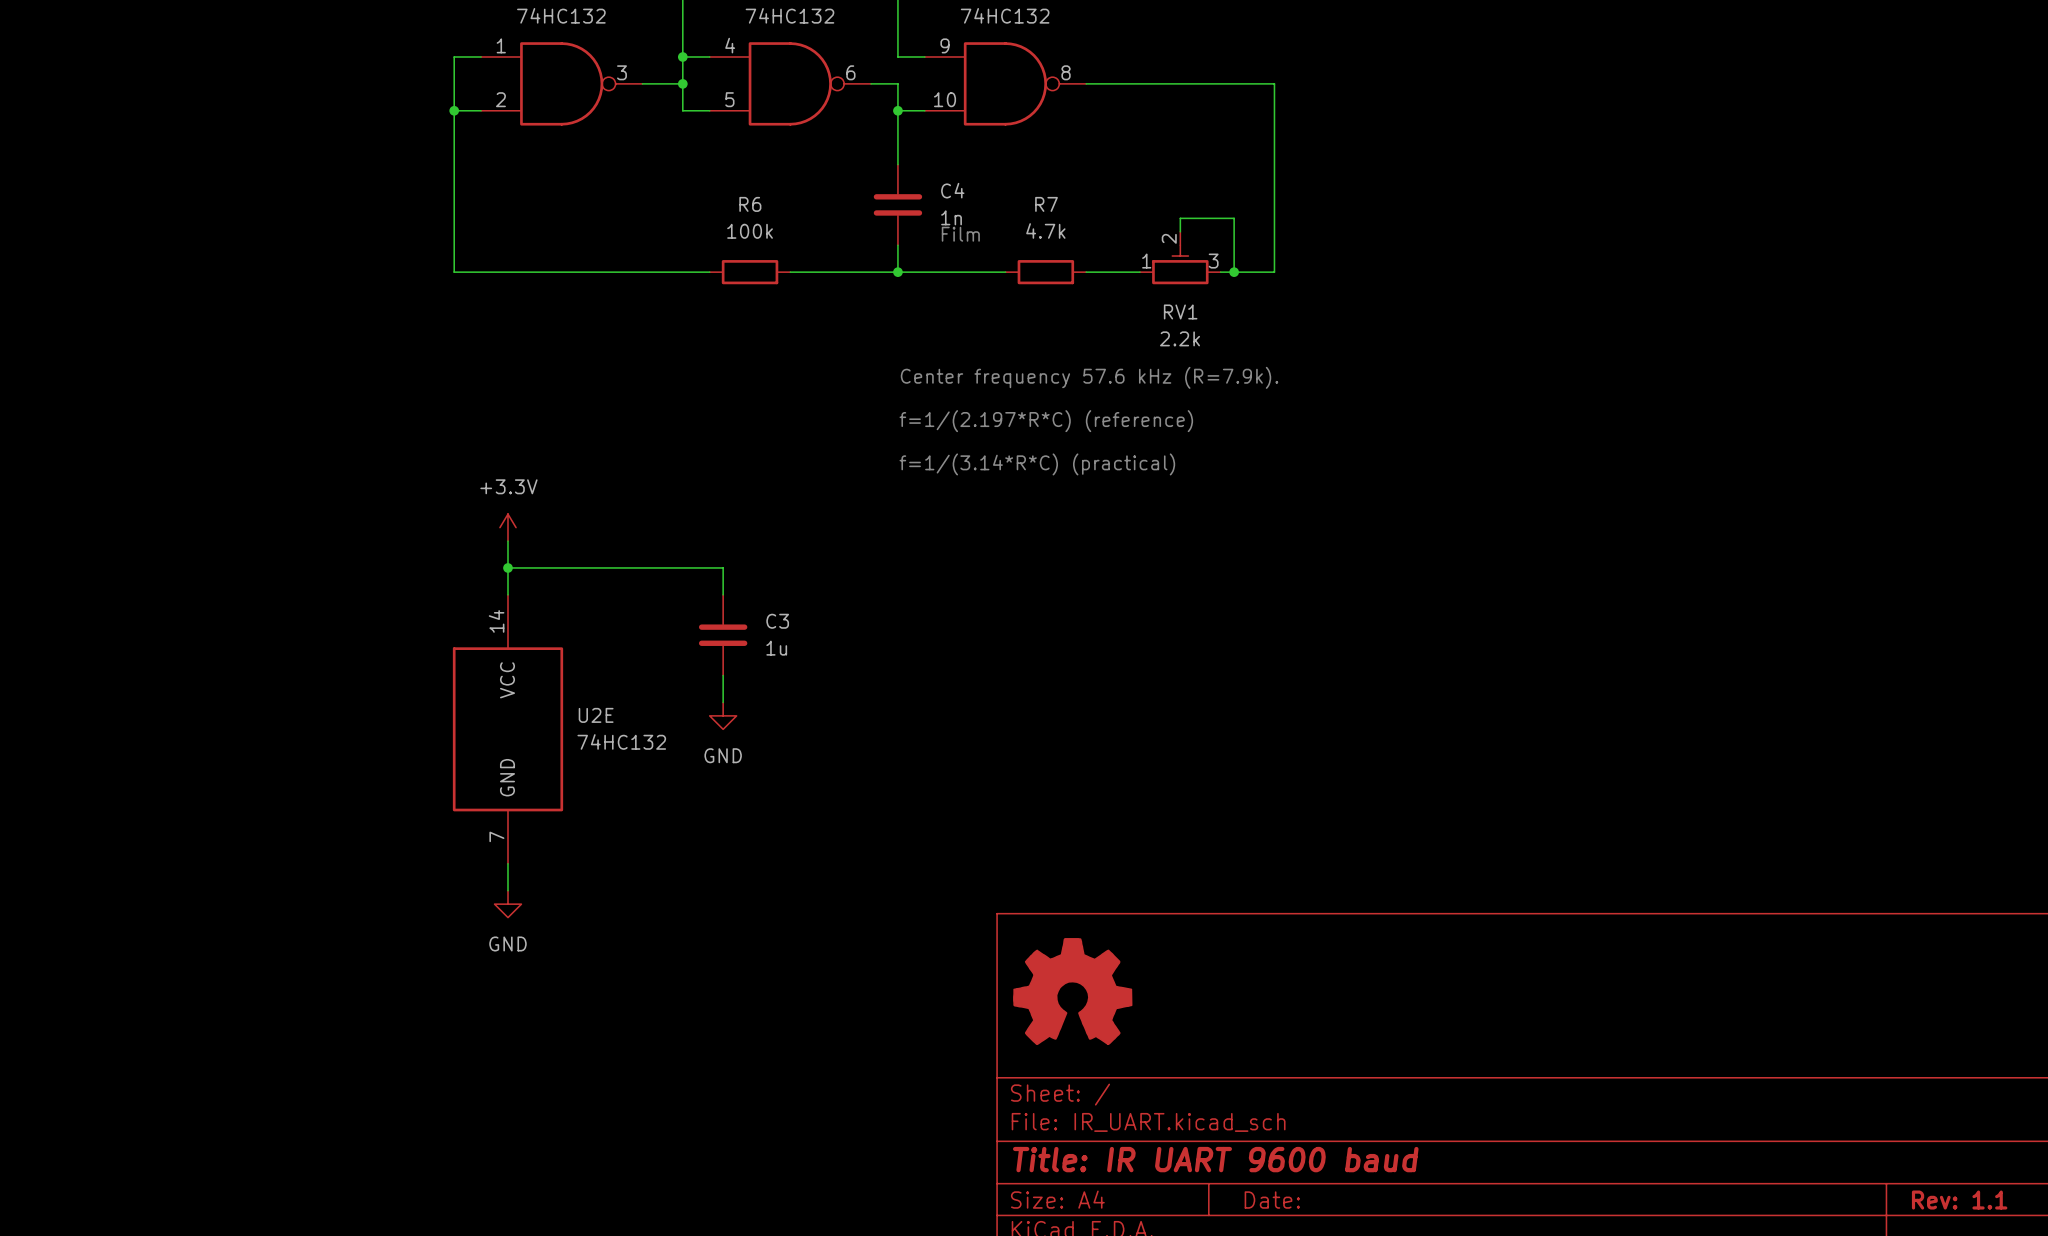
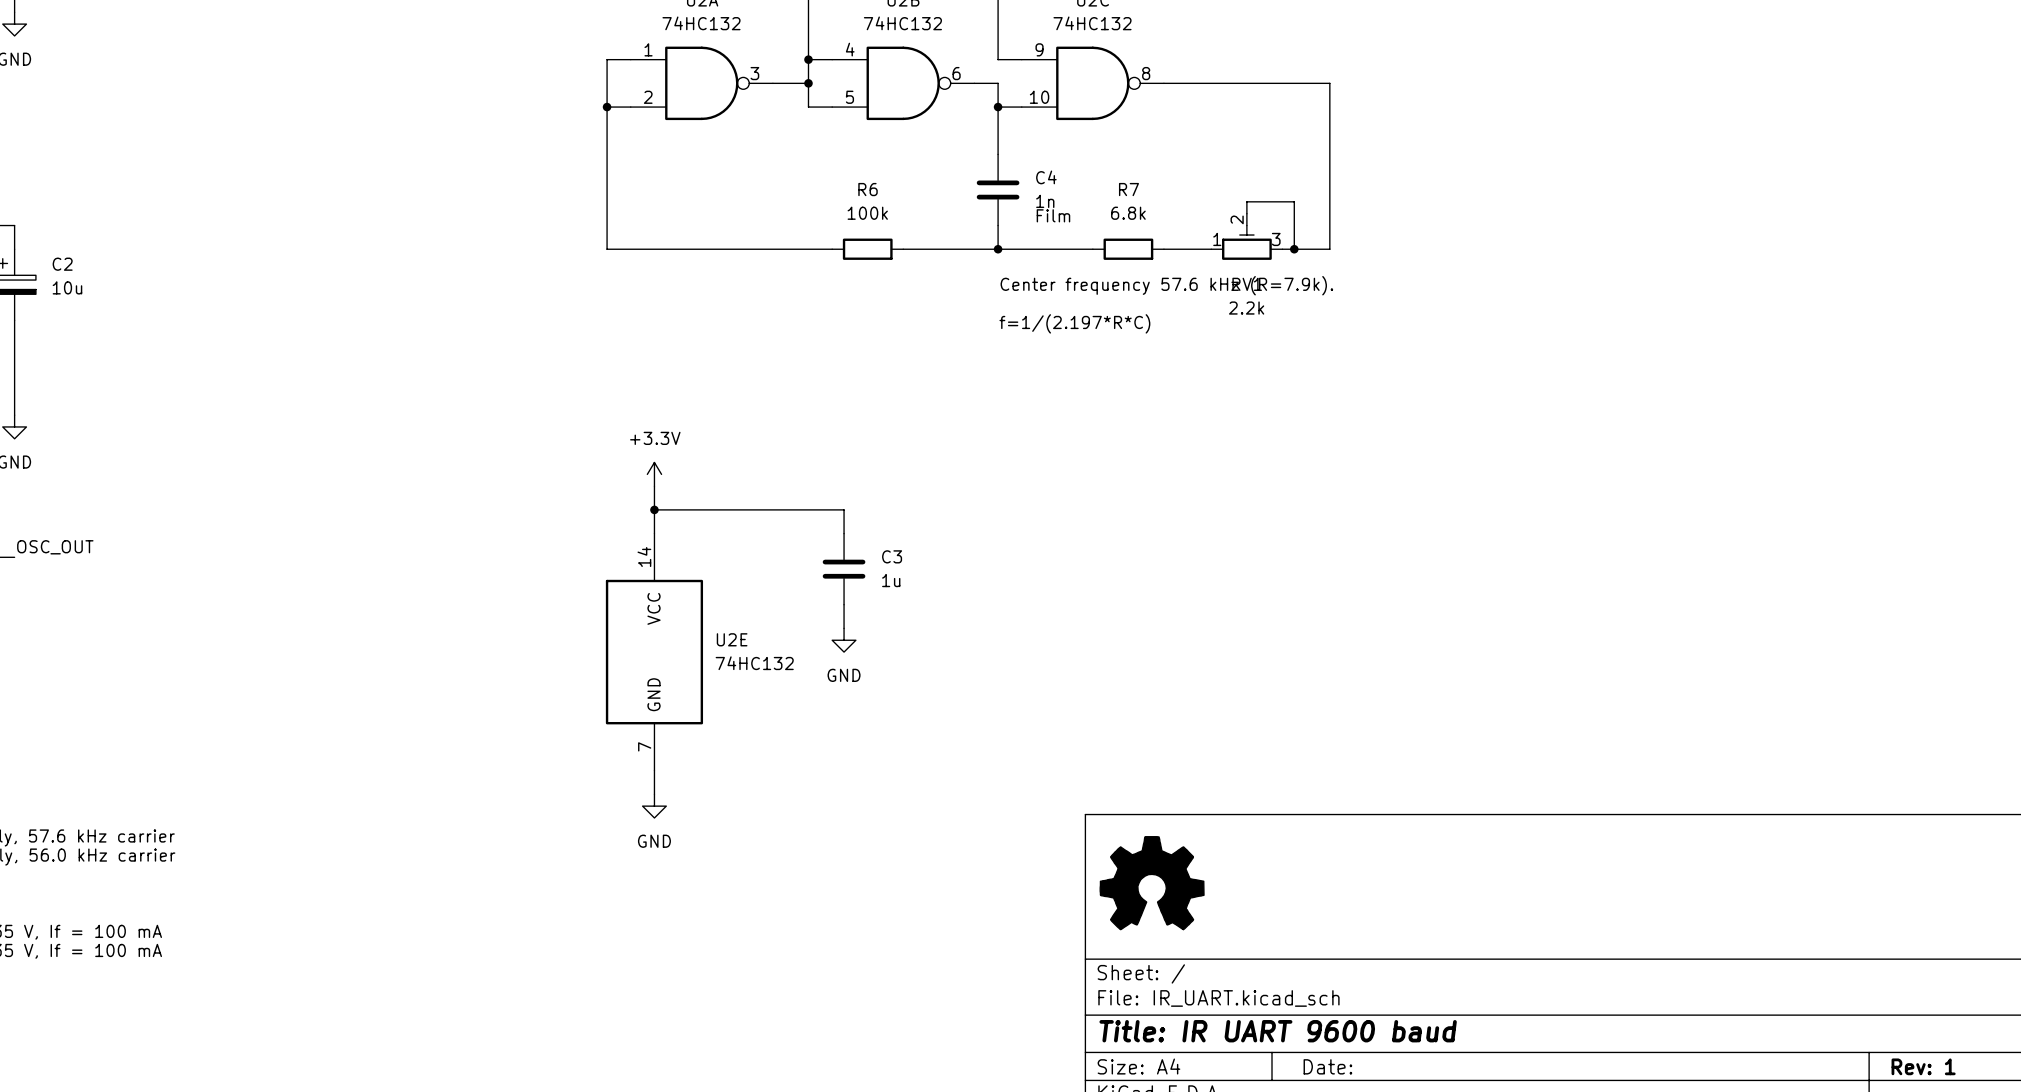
R7 value: 4.7k (1045, 230) -> 6.8k (1128, 213)
text: none -> f=1/(2.197*R*C) (1074, 323)
text position: Center frequency 57.6 kHz (R=7.9k). (1089, 377) -> Center frequency 57.6 kHz (R=7.9k). (1166, 285)
text: f=1/(2.197*R*C) (reference) (1046, 421) -> none
text: f=1/(3.14*R*C) (practical) (1037, 464) -> none
title block: Rev: 1.1 (1959, 1200) -> Rev: 1 (1923, 1066)

